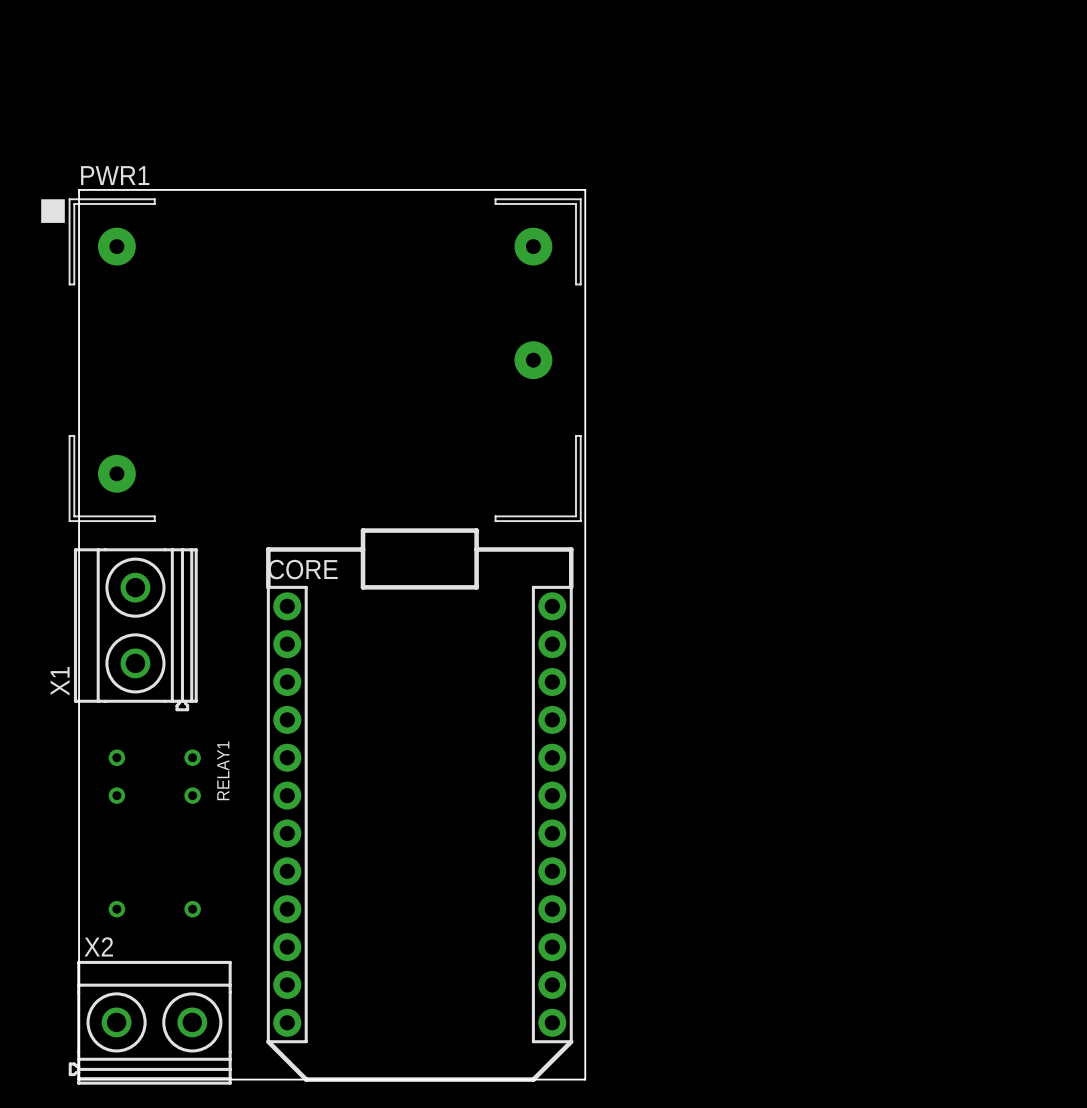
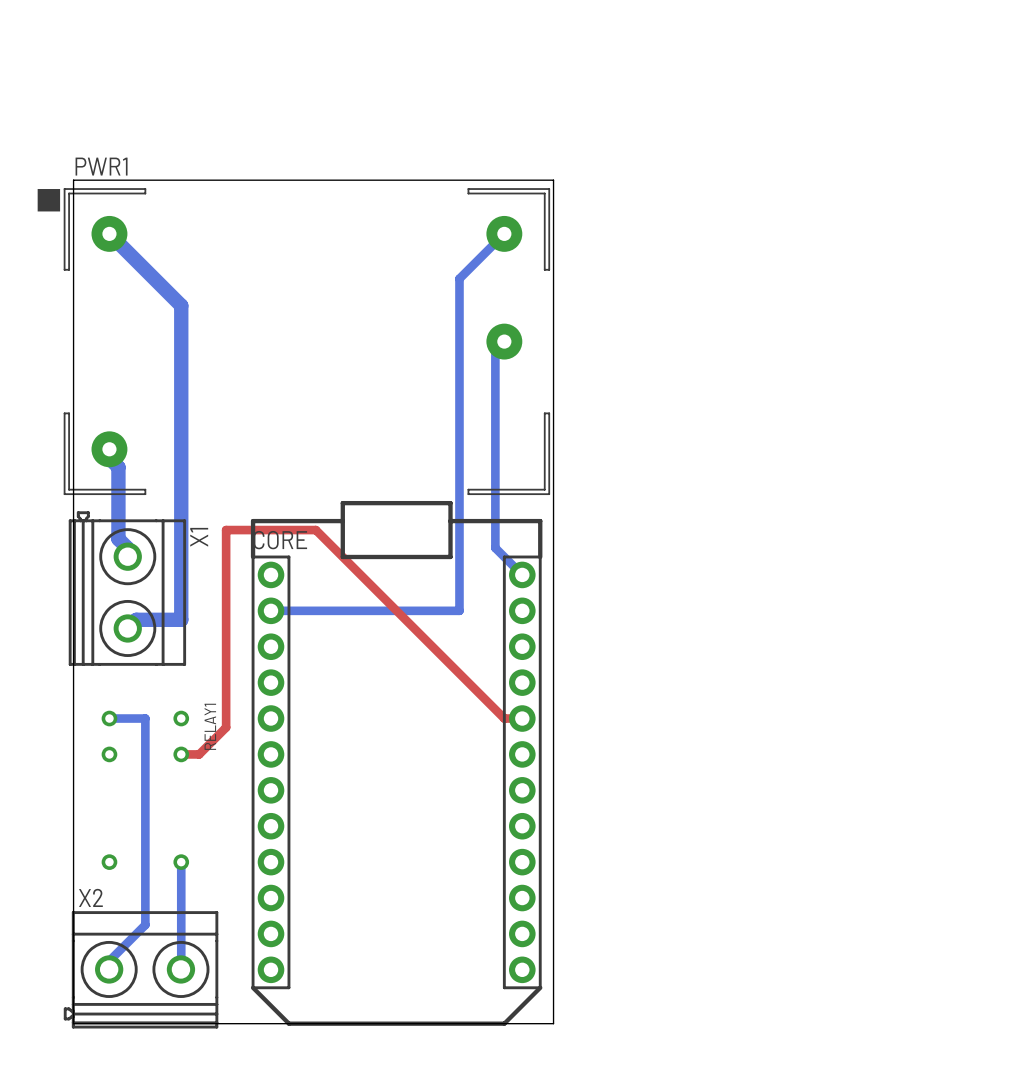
bottom track: none -> (109, 233) (109, 242) (118, 242) (181, 305) (181, 619) (136, 619) (127, 628)
bottom track: none -> (504, 233) (459, 278) (459, 610) (271, 610)
bottom track: none -> (504, 341) (495, 350) (495, 548) (522, 574)
bottom track: none -> (109, 449) (109, 458) (118, 467) (118, 539) (127, 548) (127, 556)
X1 rotation: 0° (135, 629) -> 180° (127, 588)
bottom track: none -> (109, 718) (145, 718) (145, 924) (109, 960) (109, 969)
top track: none -> (522, 718) (504, 718) (315, 530) (226, 530) (226, 727) (199, 754) (181, 754)
bottom track: none -> (181, 862) (180, 969)

